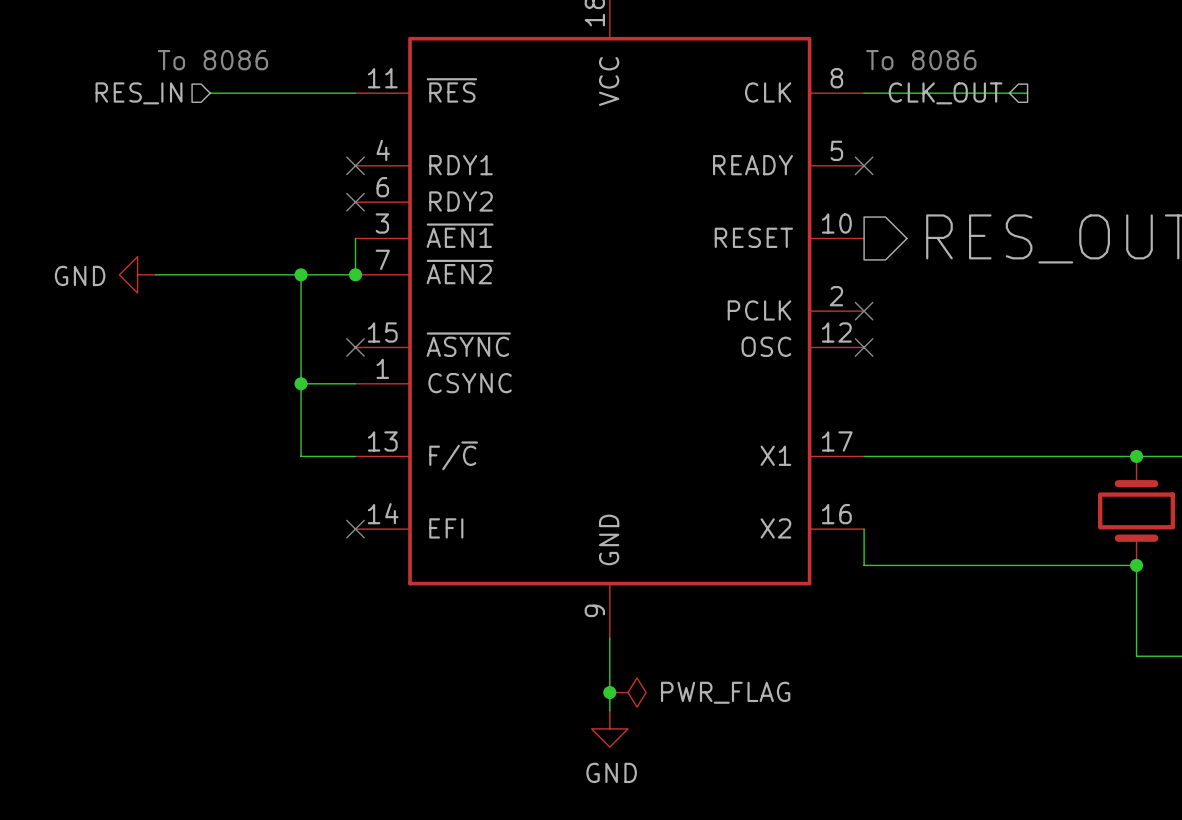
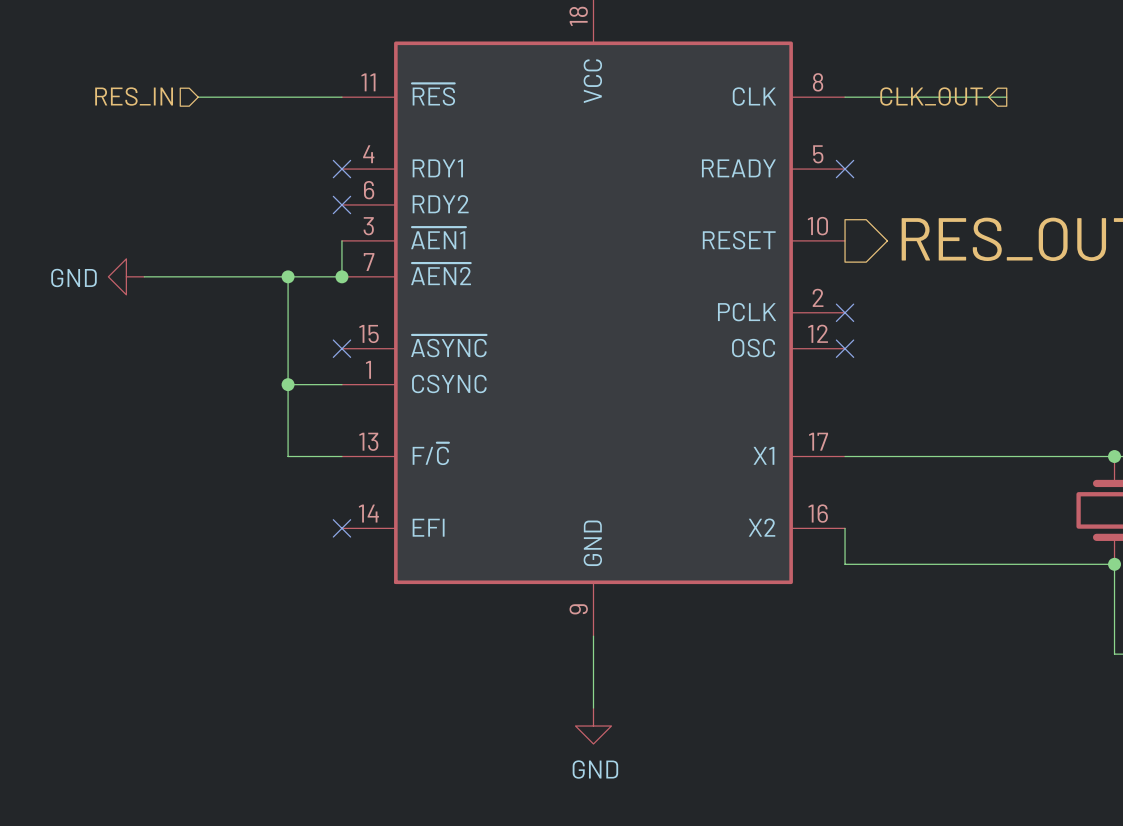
text: To 8086 (212, 60) -> none
text: To 8086 (921, 60) -> none
junction: (609, 692) -> none
power symbol: PWR_FLAG (627, 692) -> none

